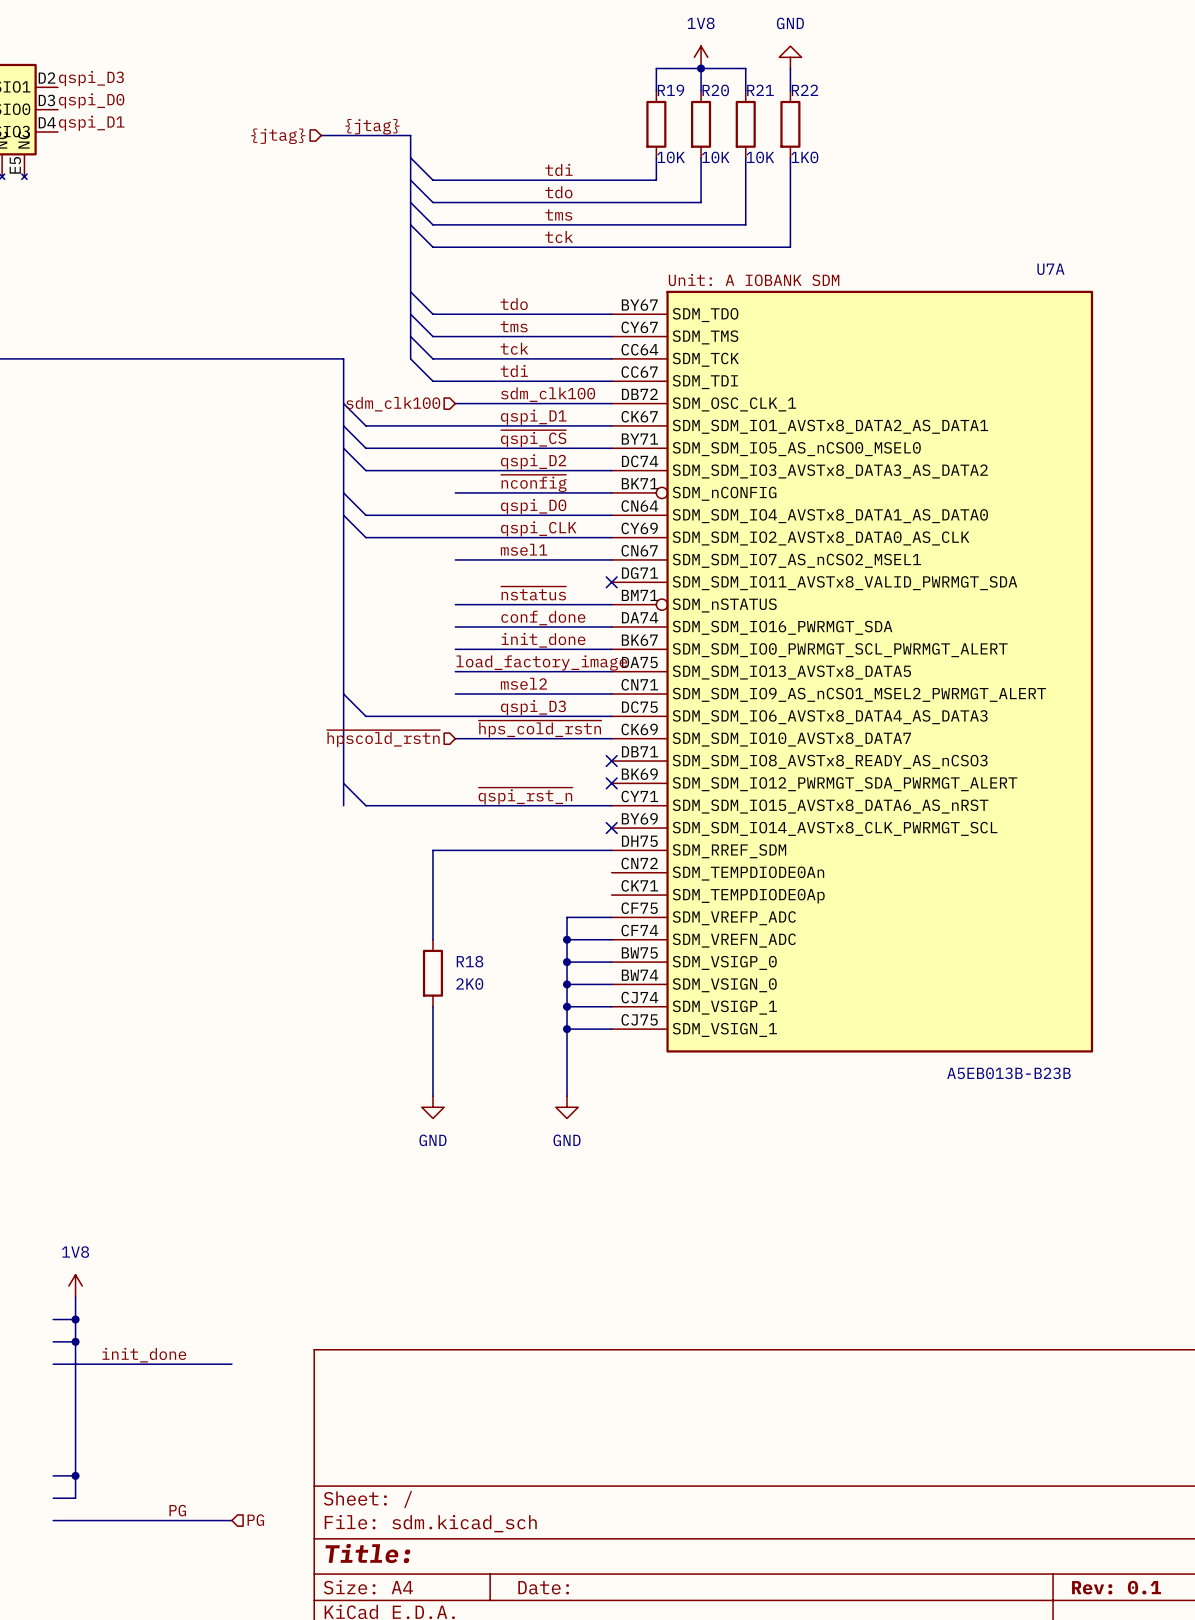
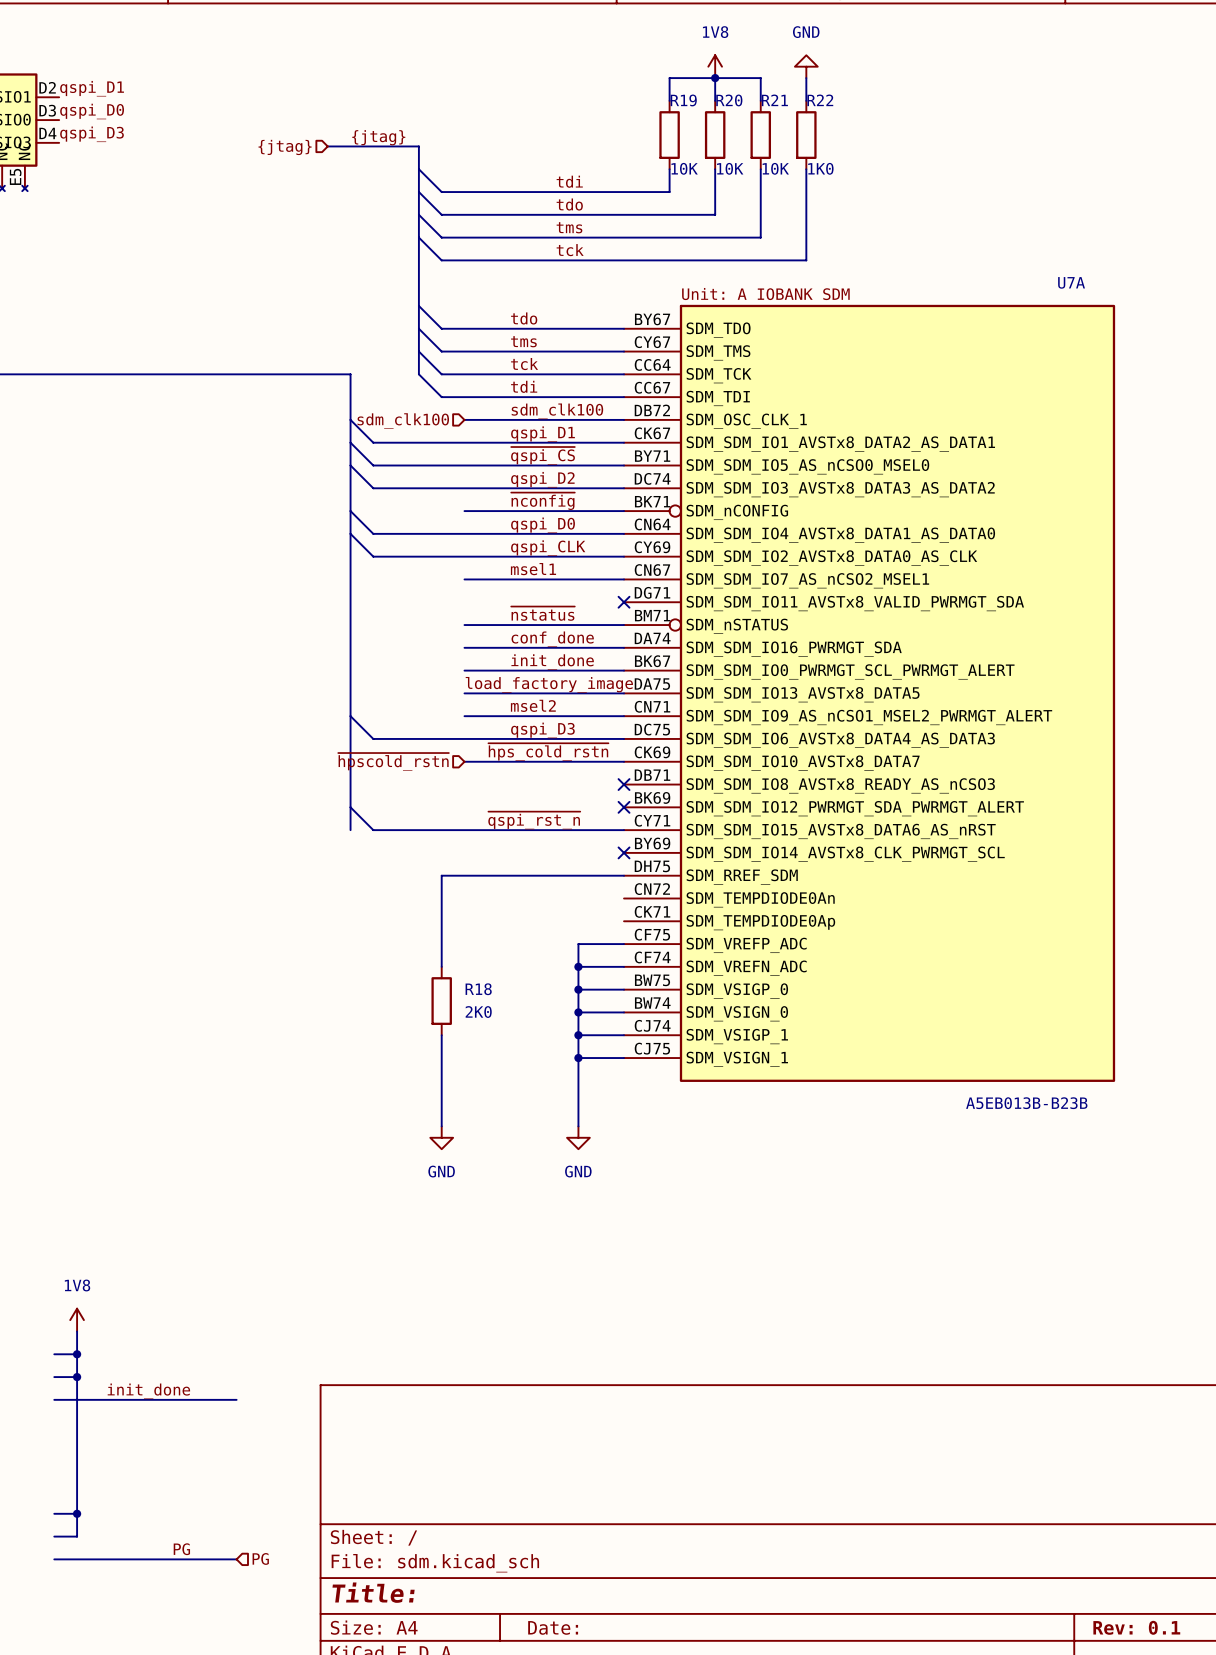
label: qspi_D3 (91, 78) -> qspi_D1 (92, 88)
label: qspi_D1 (91, 123) -> qspi_D3 (92, 134)

